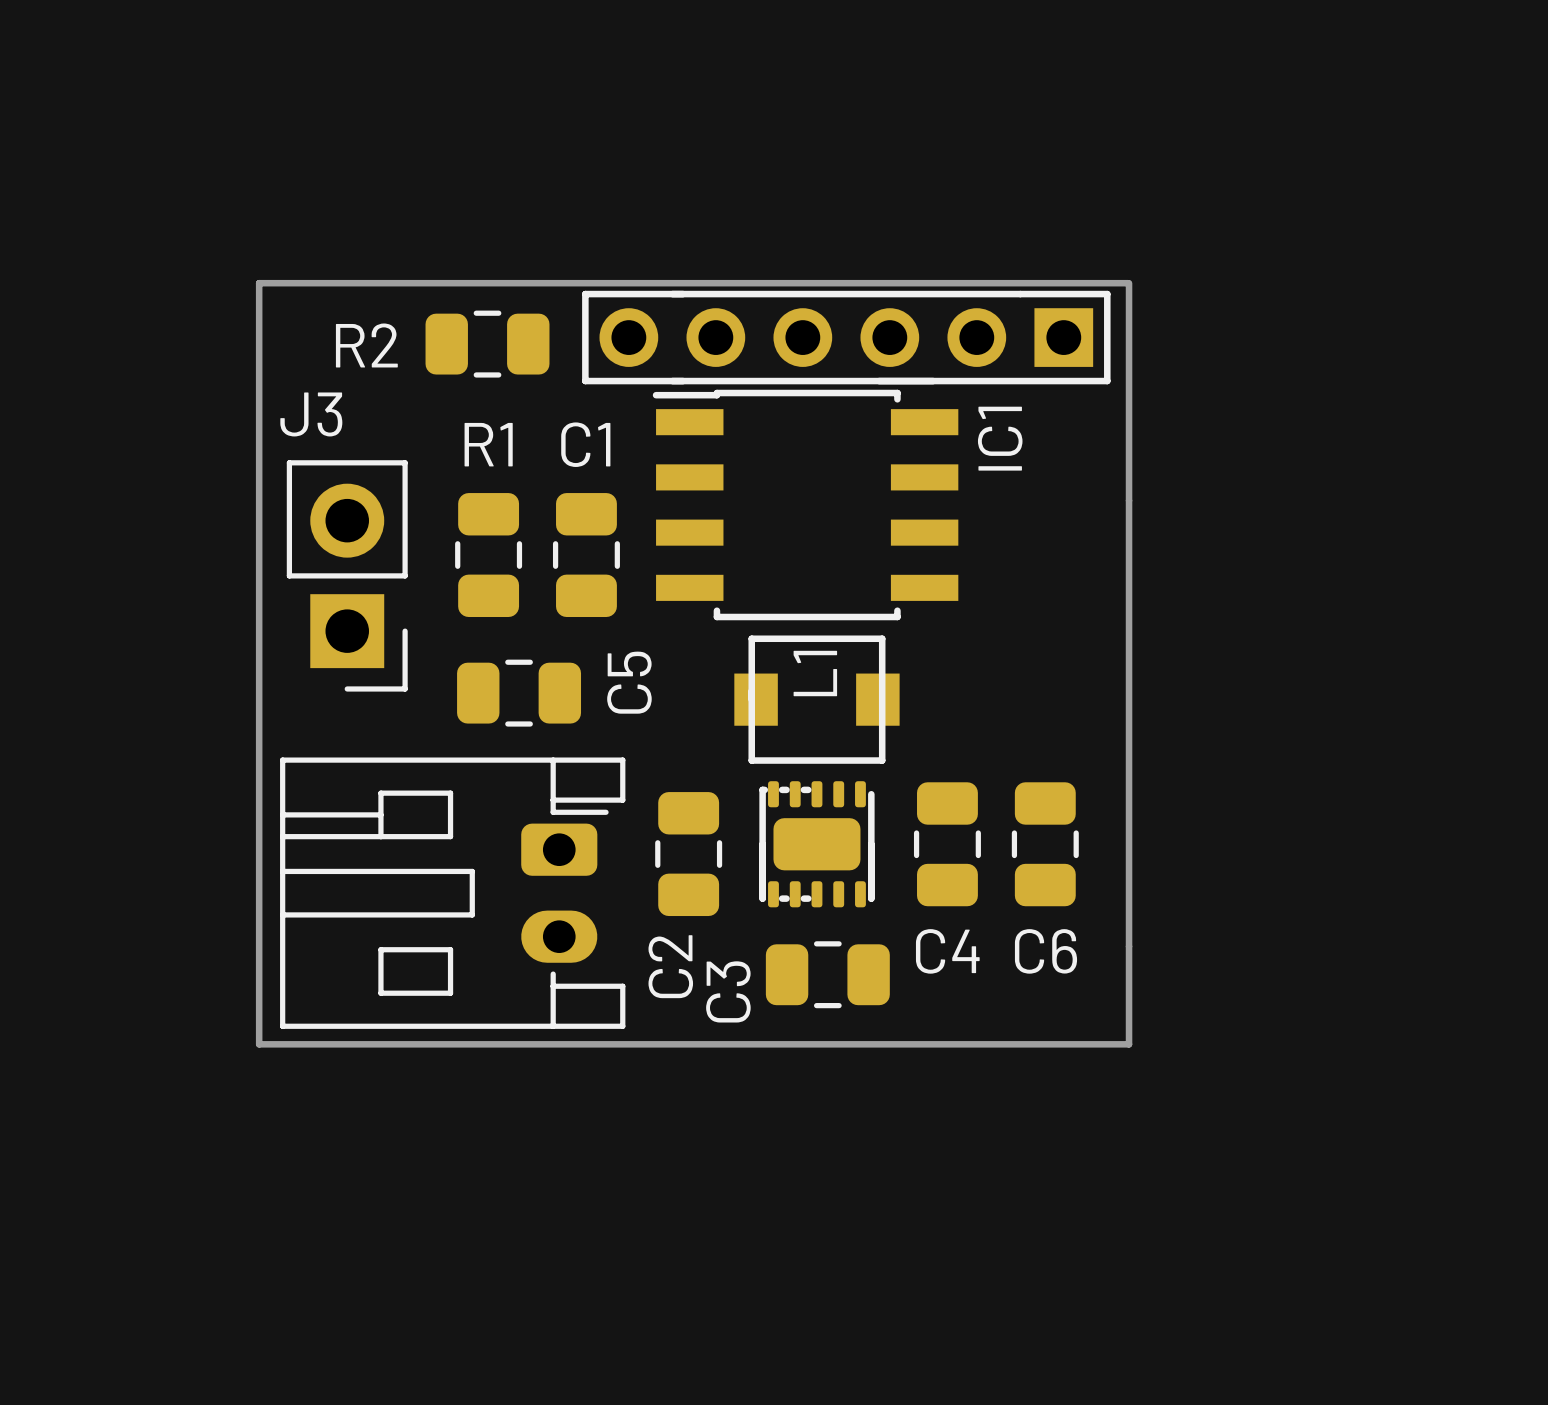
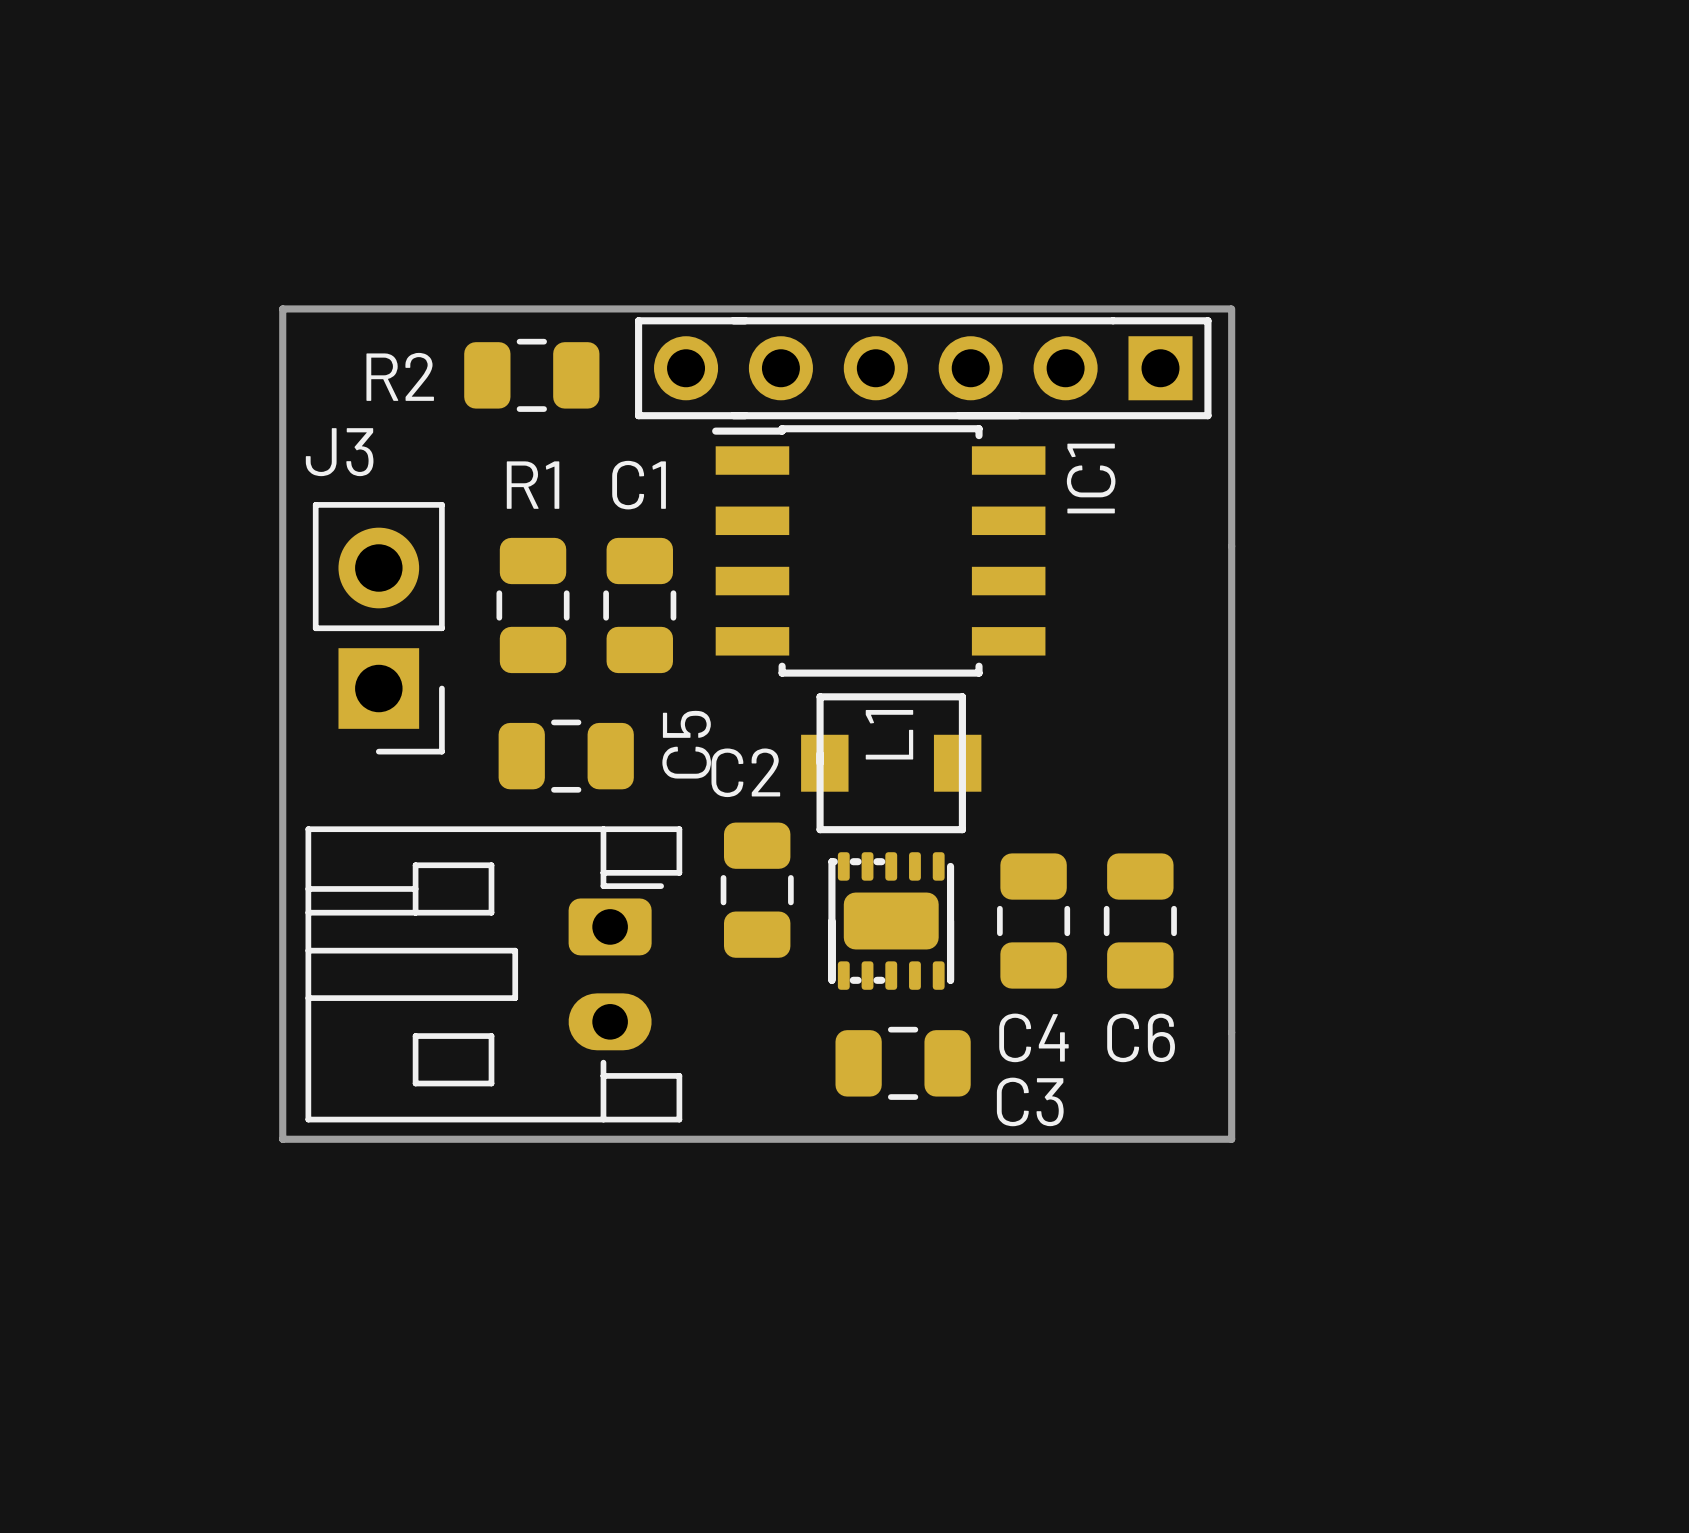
C2 position: (688, 854) -> (757, 890)
C2 name rotation: 0° (670, 966) -> 90° clockwise (745, 772)
C2 name position: C2 (670, 966) -> C2 (745, 772)
C3 name rotation: 0° (728, 991) -> 90° clockwise (1030, 1101)
C3 name position: C3 (728, 991) -> C3 (1030, 1101)

